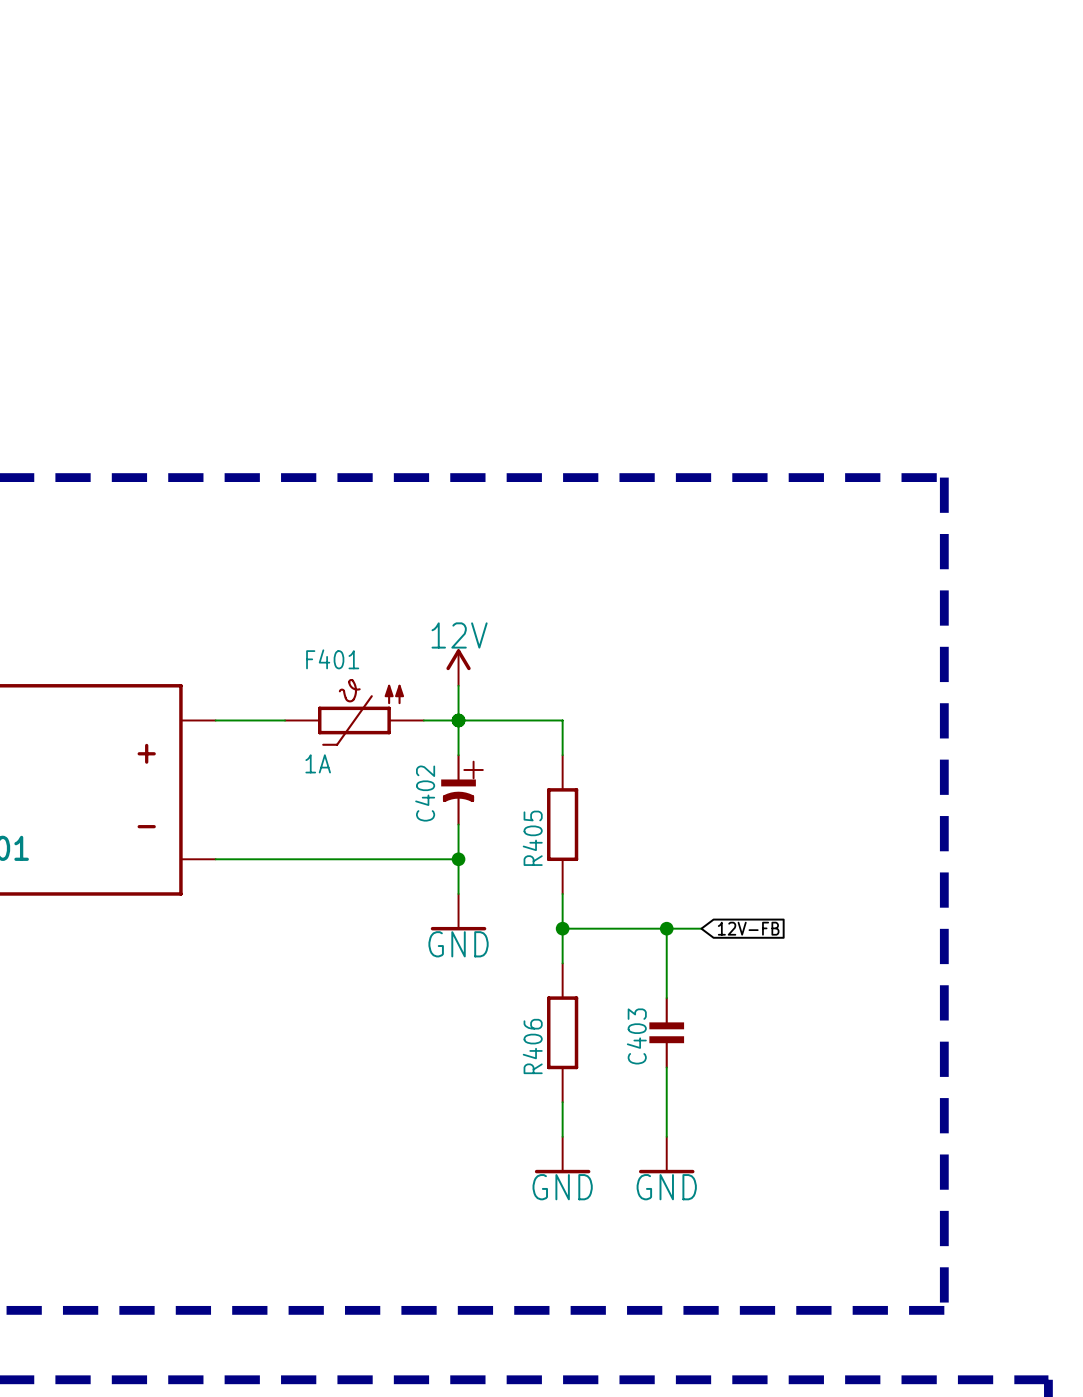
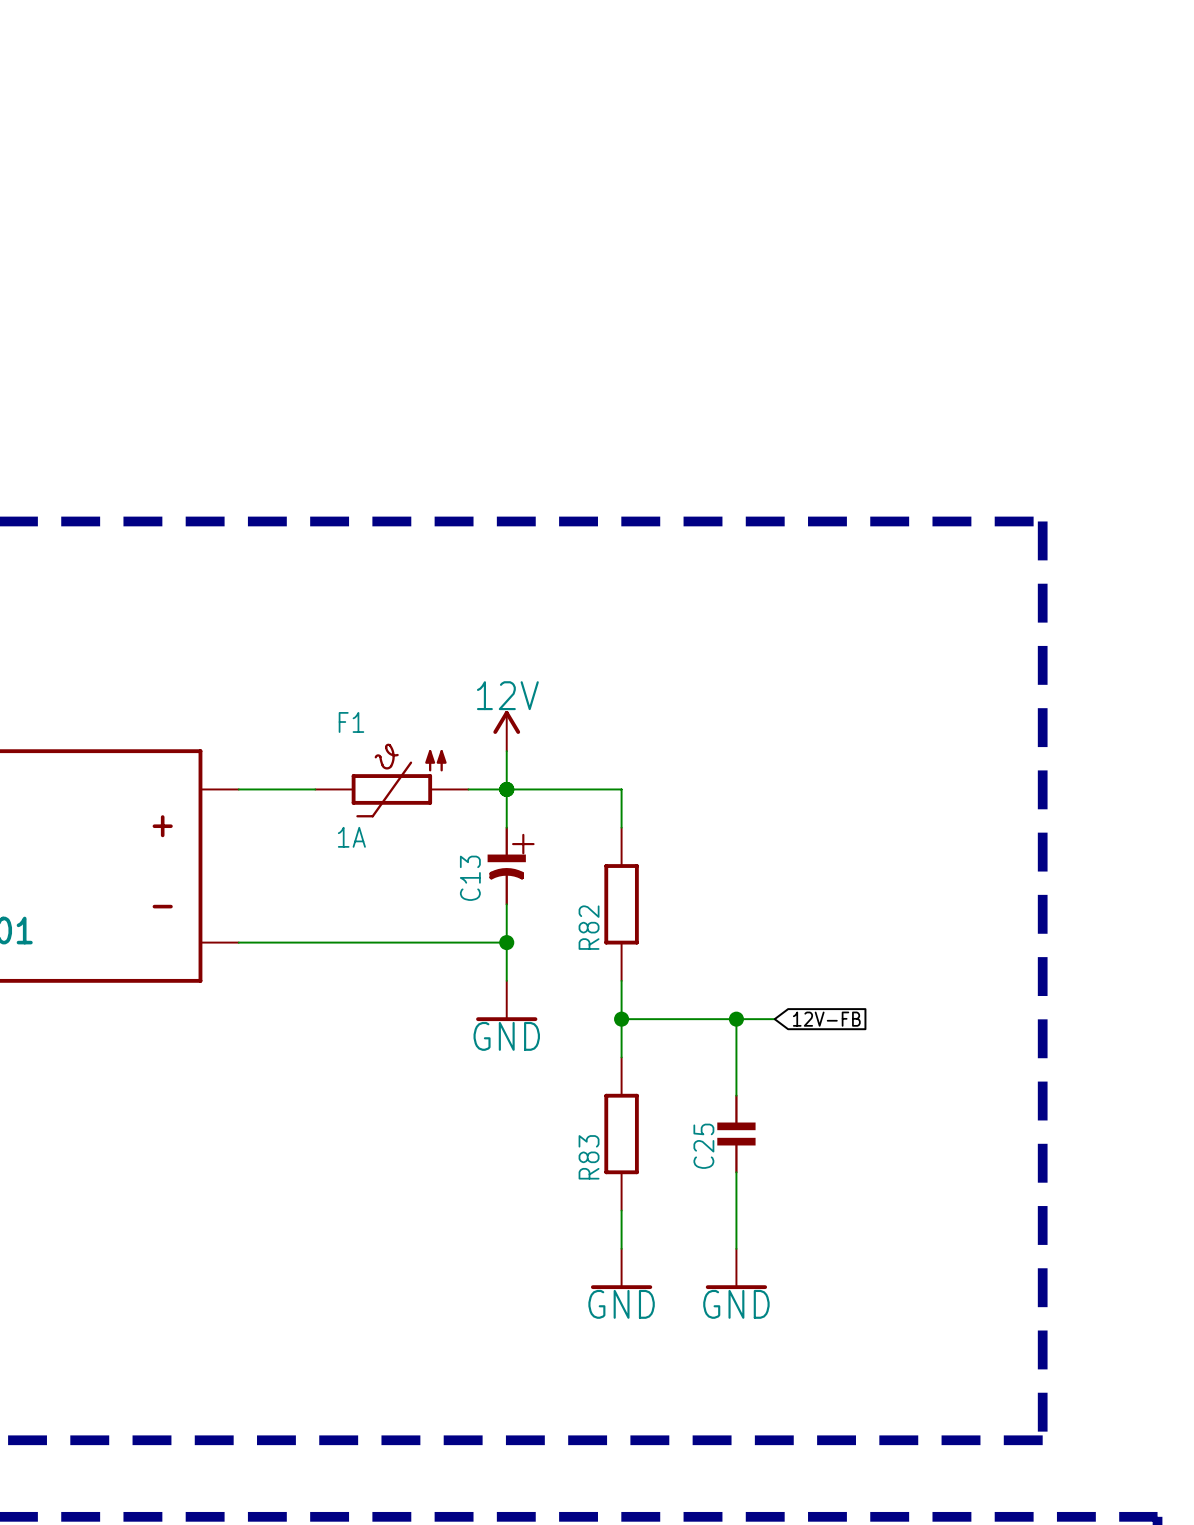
F401 name: F401 (332, 659) -> F1 (351, 722)
C402 name: C402 (425, 793) -> C13 (470, 878)
R405 name: R405 (532, 838) -> R82 (589, 927)
C403 name: C403 (636, 1036) -> C25 (703, 1146)
R406 name: R406 (532, 1046) -> R83 (589, 1157)

